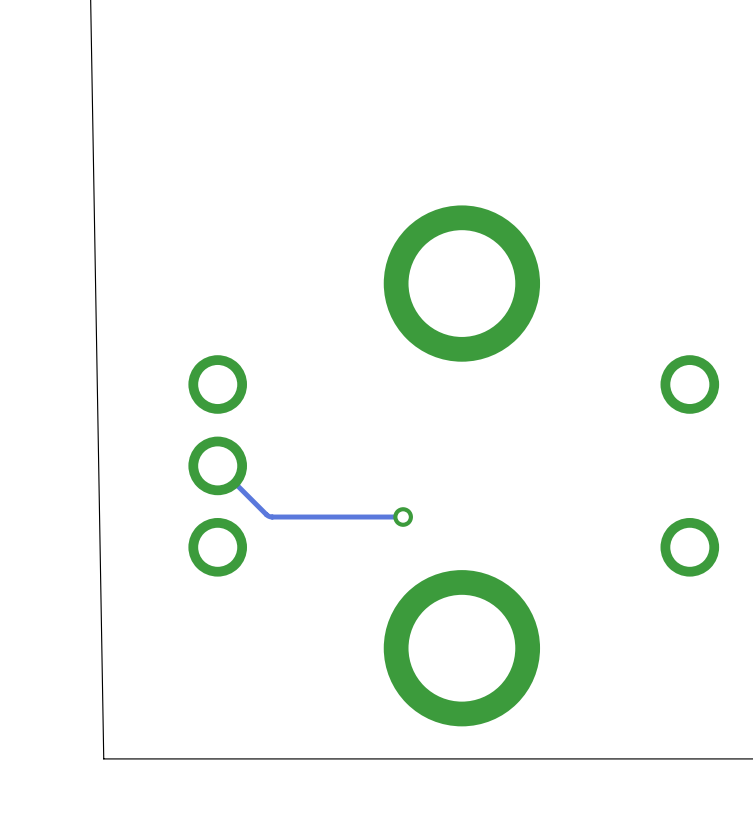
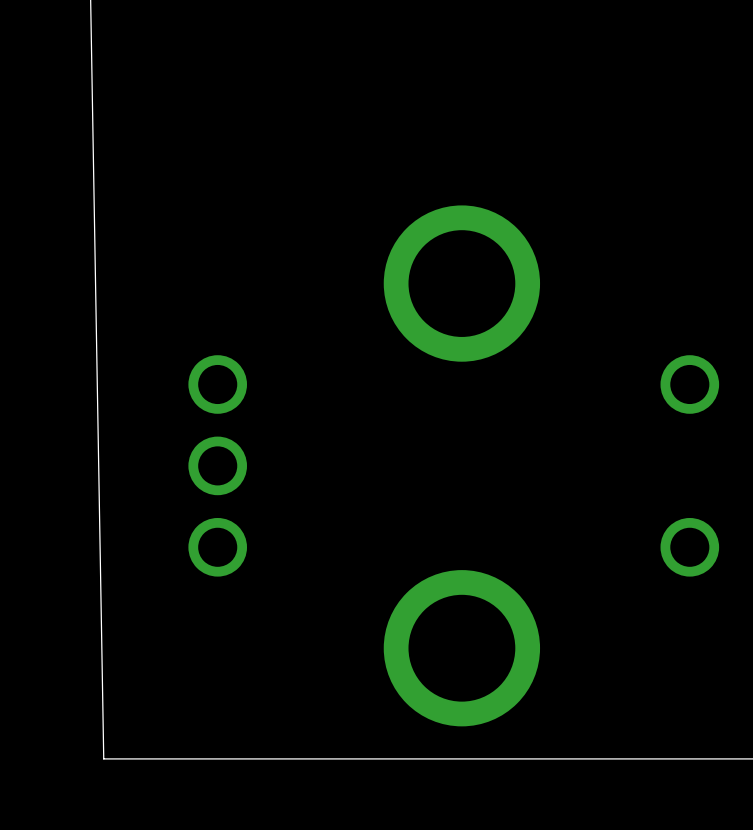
track: (217, 465) (270, 516) (403, 517) -> none
via: (403, 517) -> none

